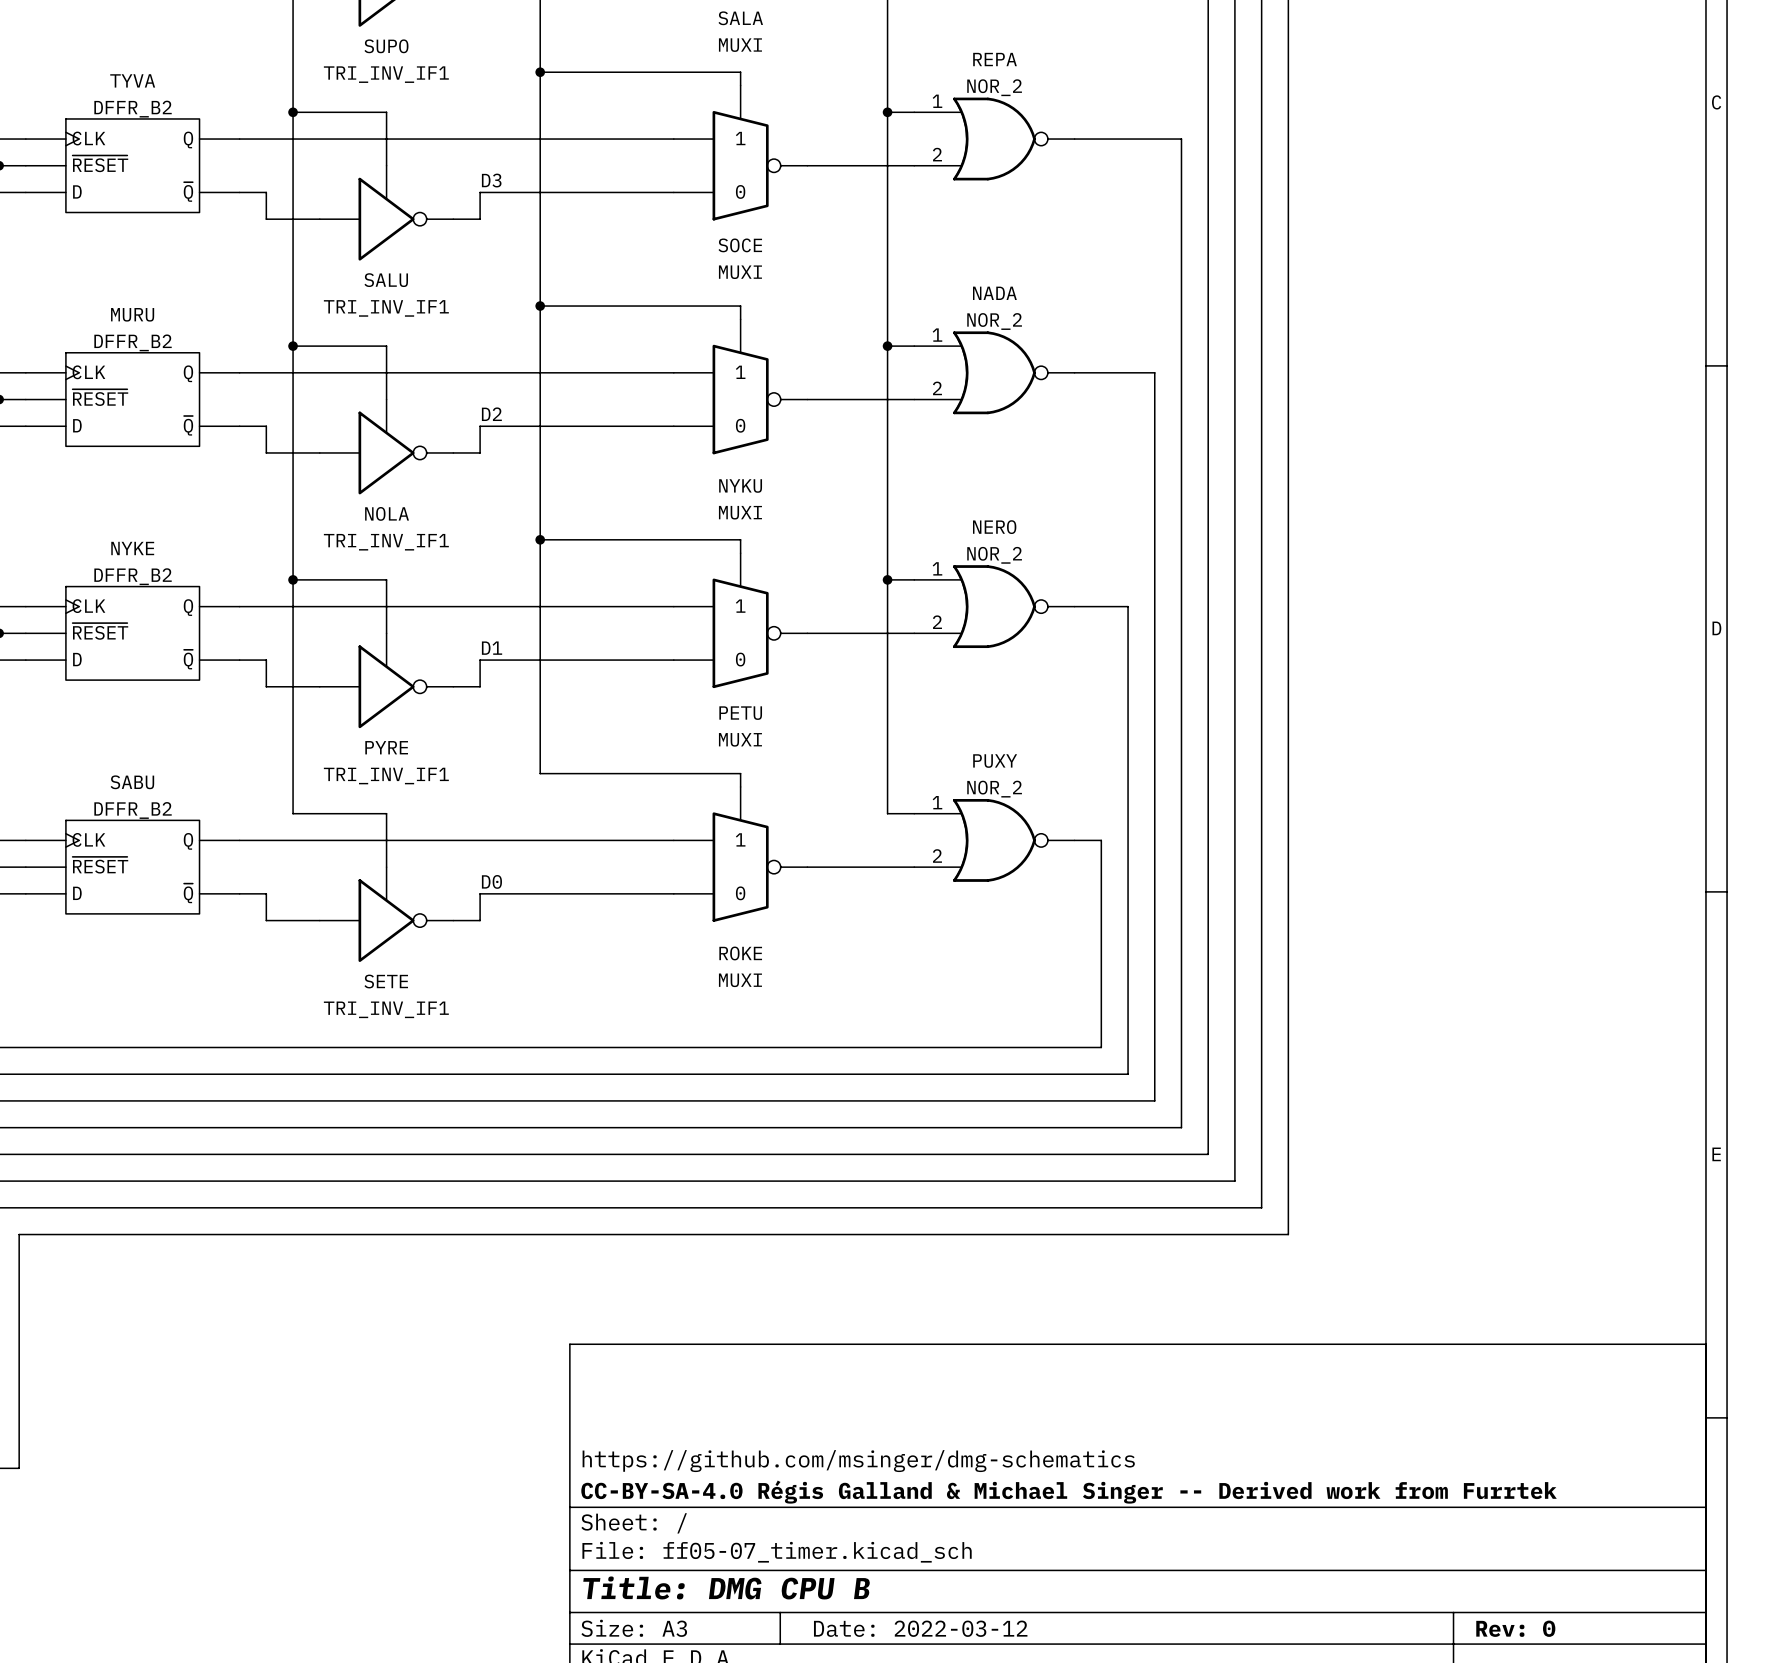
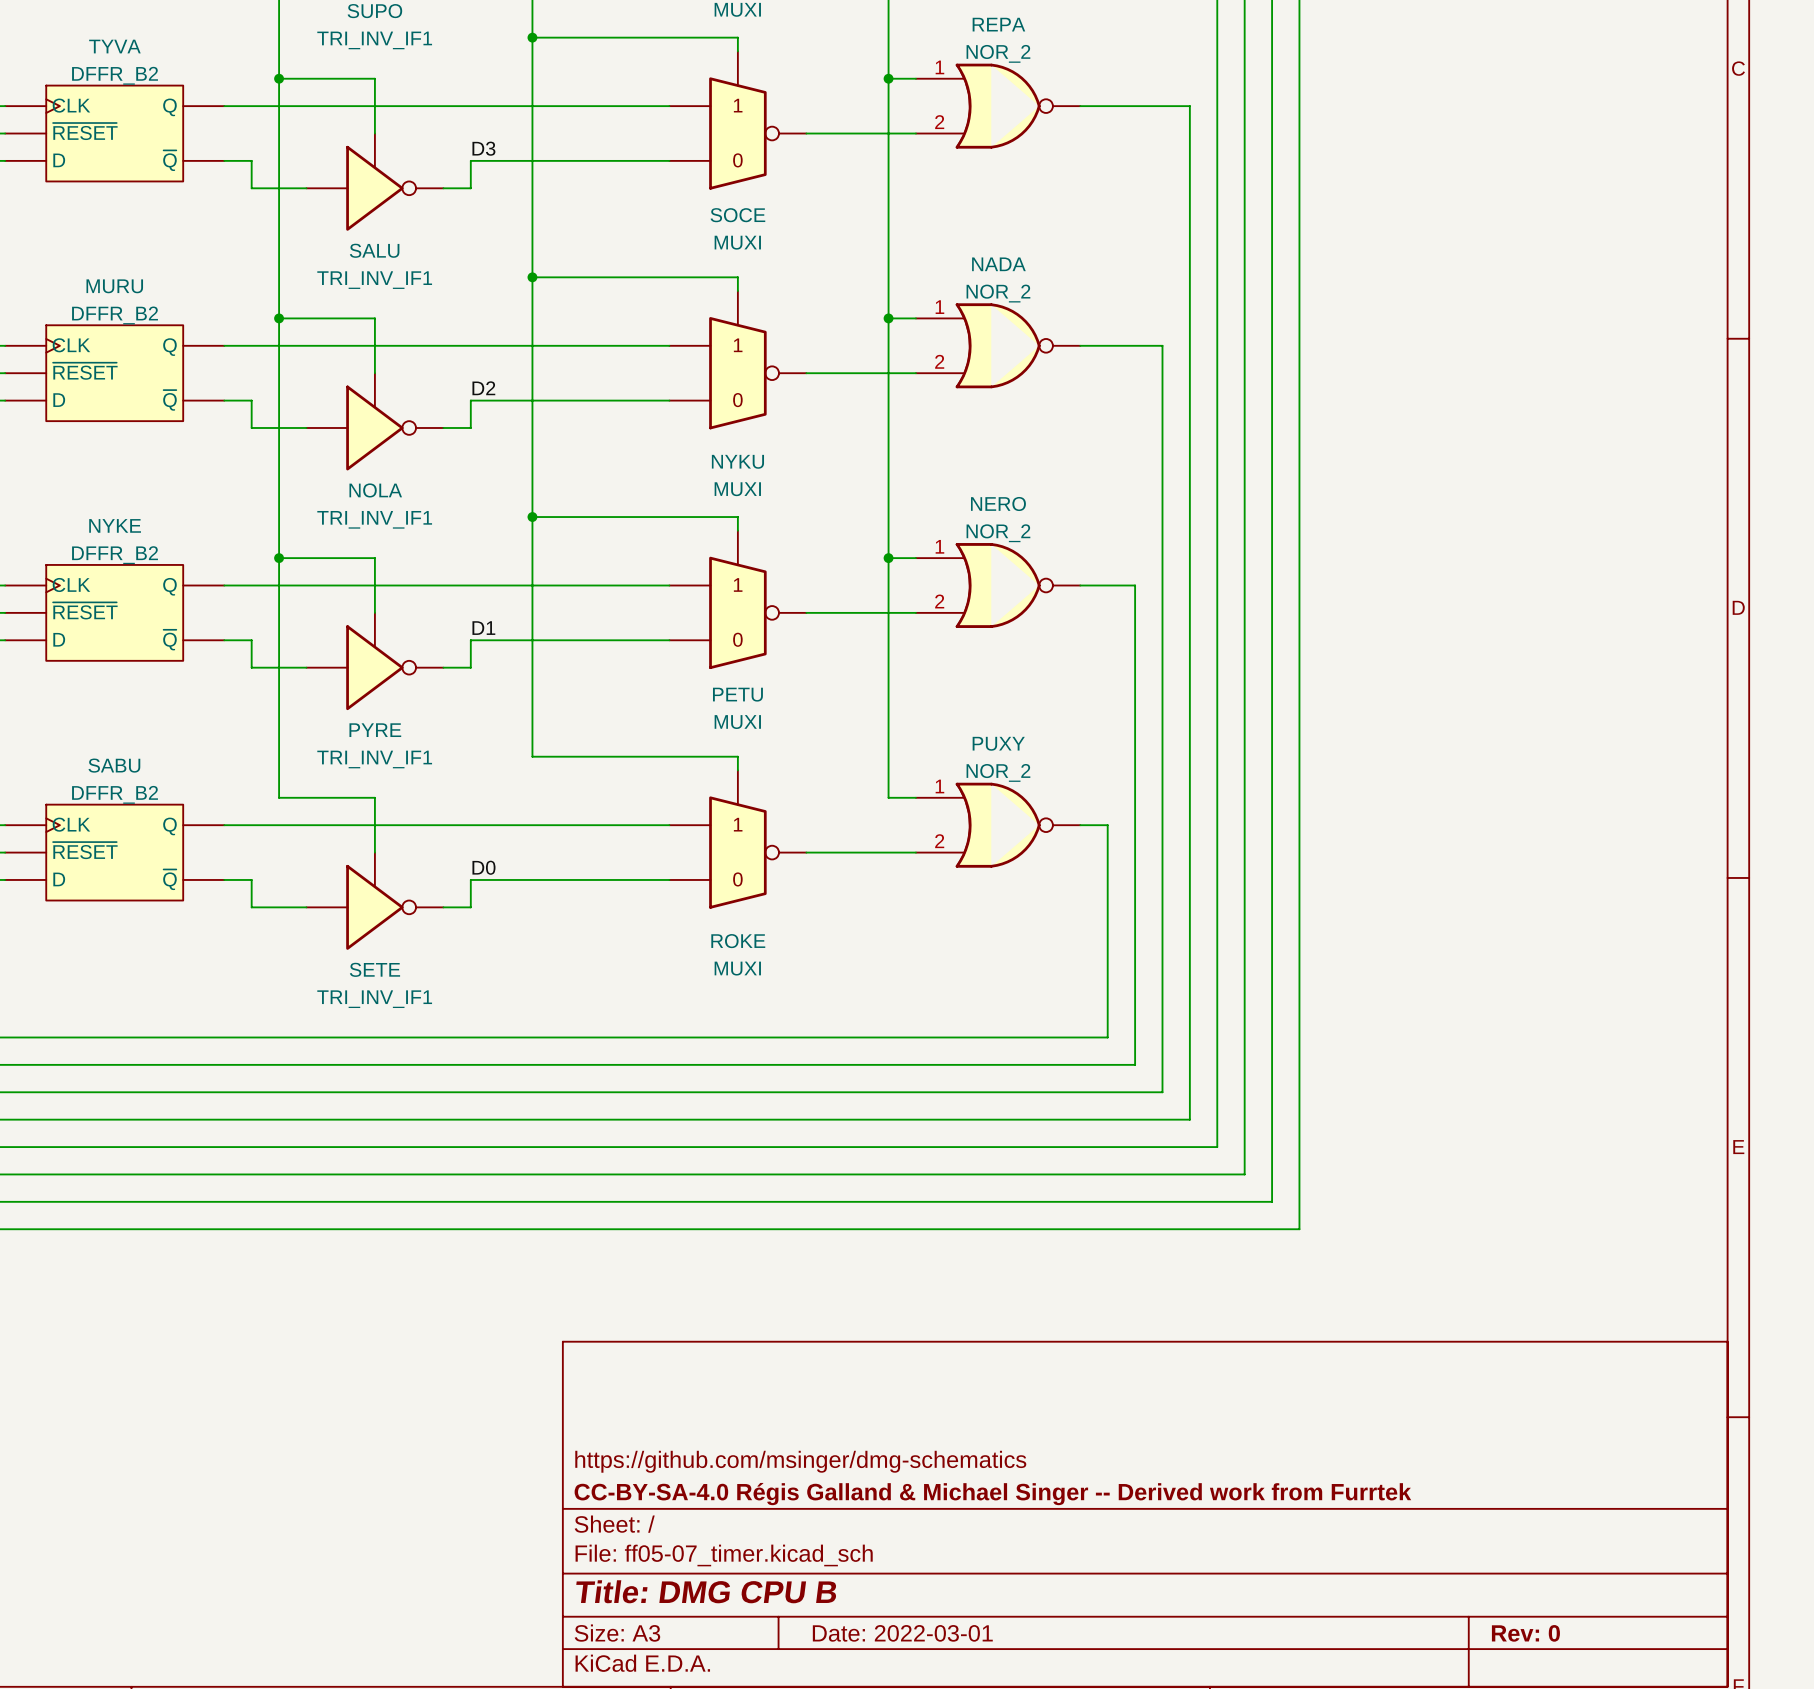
title block: Date: 2022-03-12 (920, 1628) -> Date: 2022-03-01 (902, 1633)

